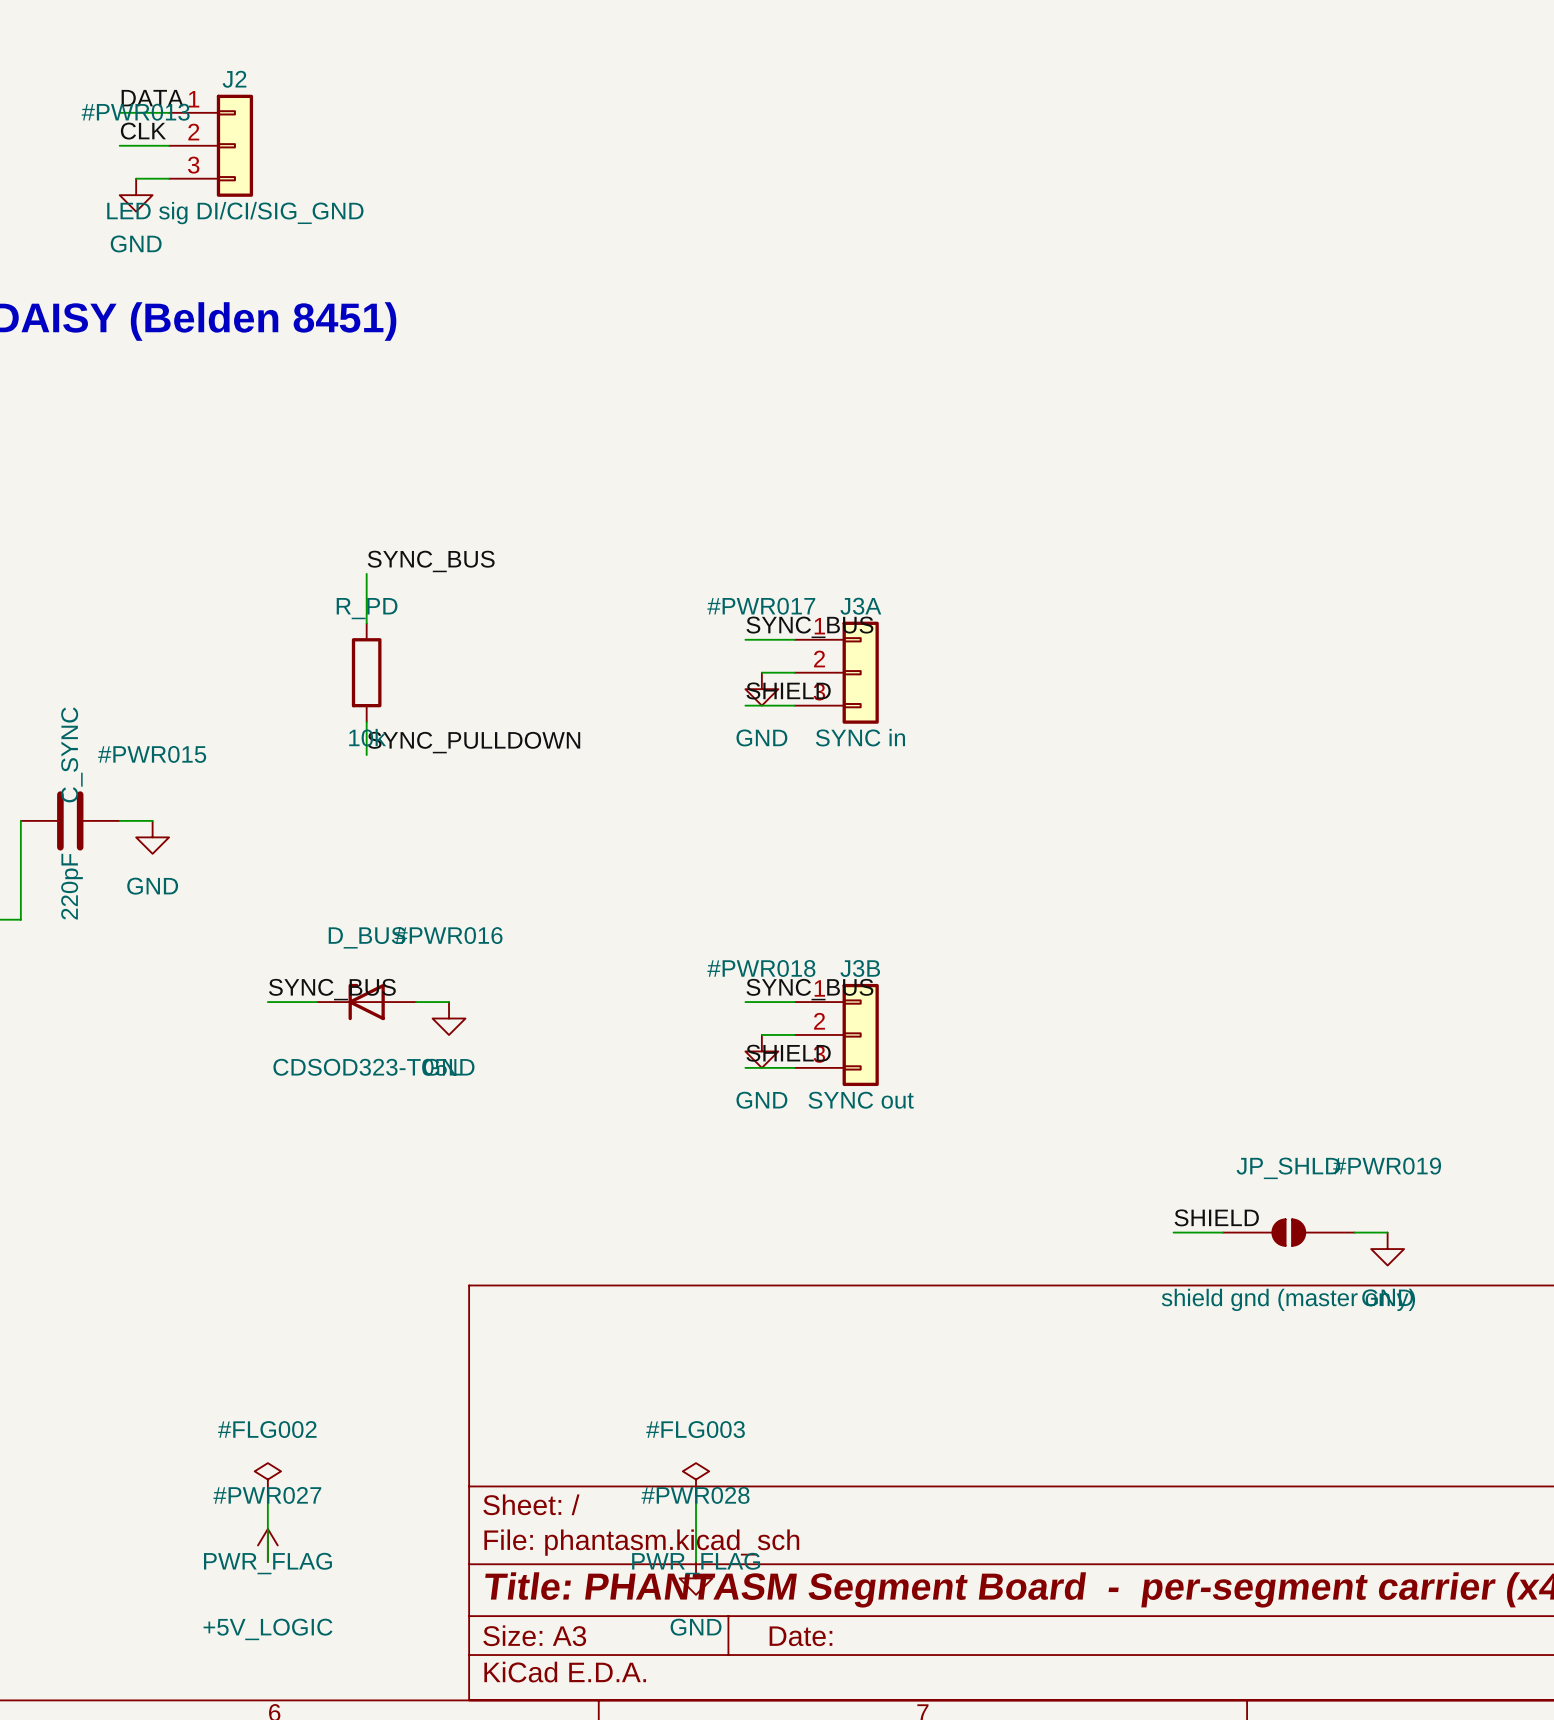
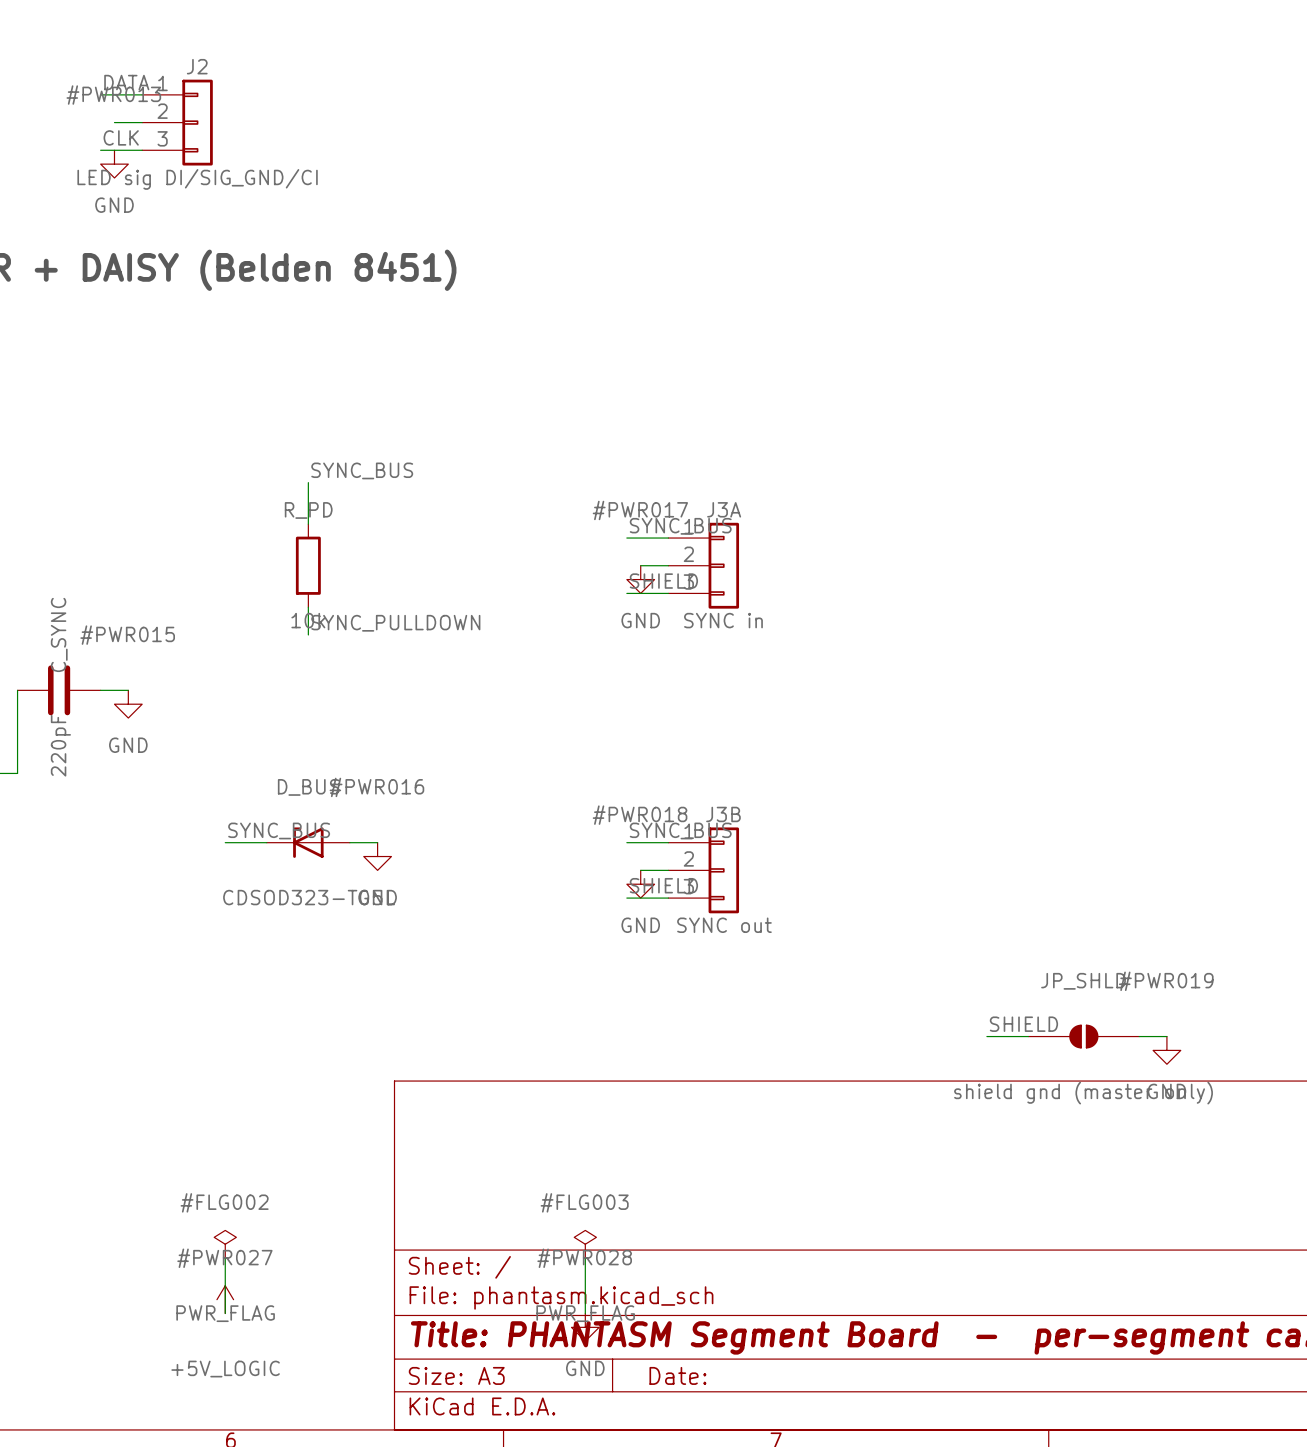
label position: CLK (143, 131) -> CLK (121, 137)
wire: (119, 145) (136, 145) -> (100, 150) (114, 150)
J2 value: LED sig DI/CI/SIG_GND (235, 213) -> LED sig DI/SIG_GND/CI (197, 179)

